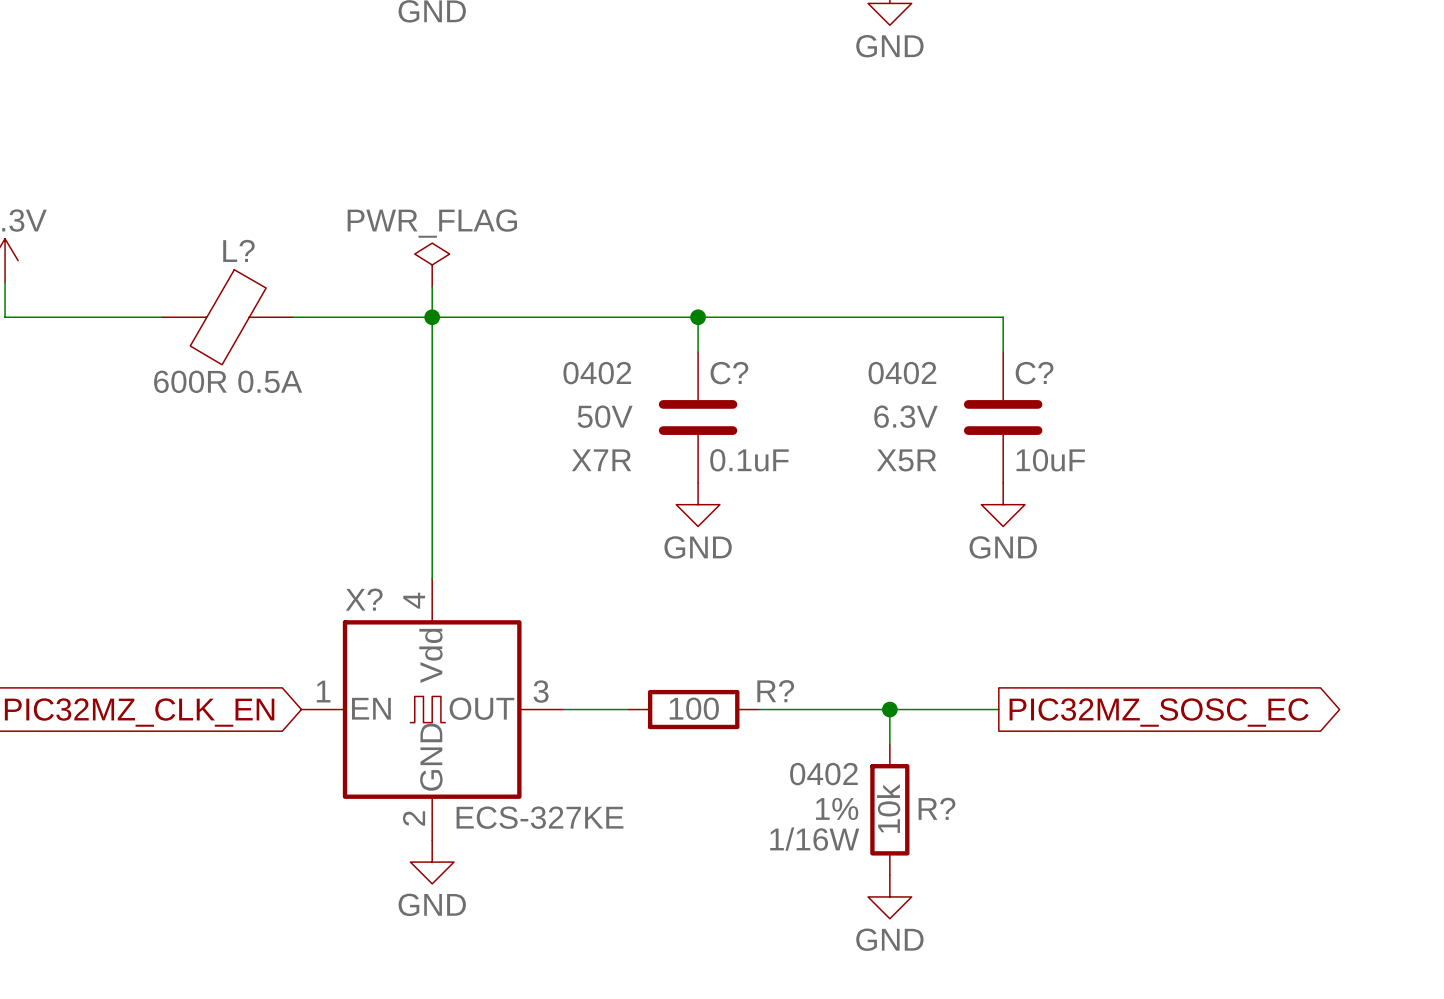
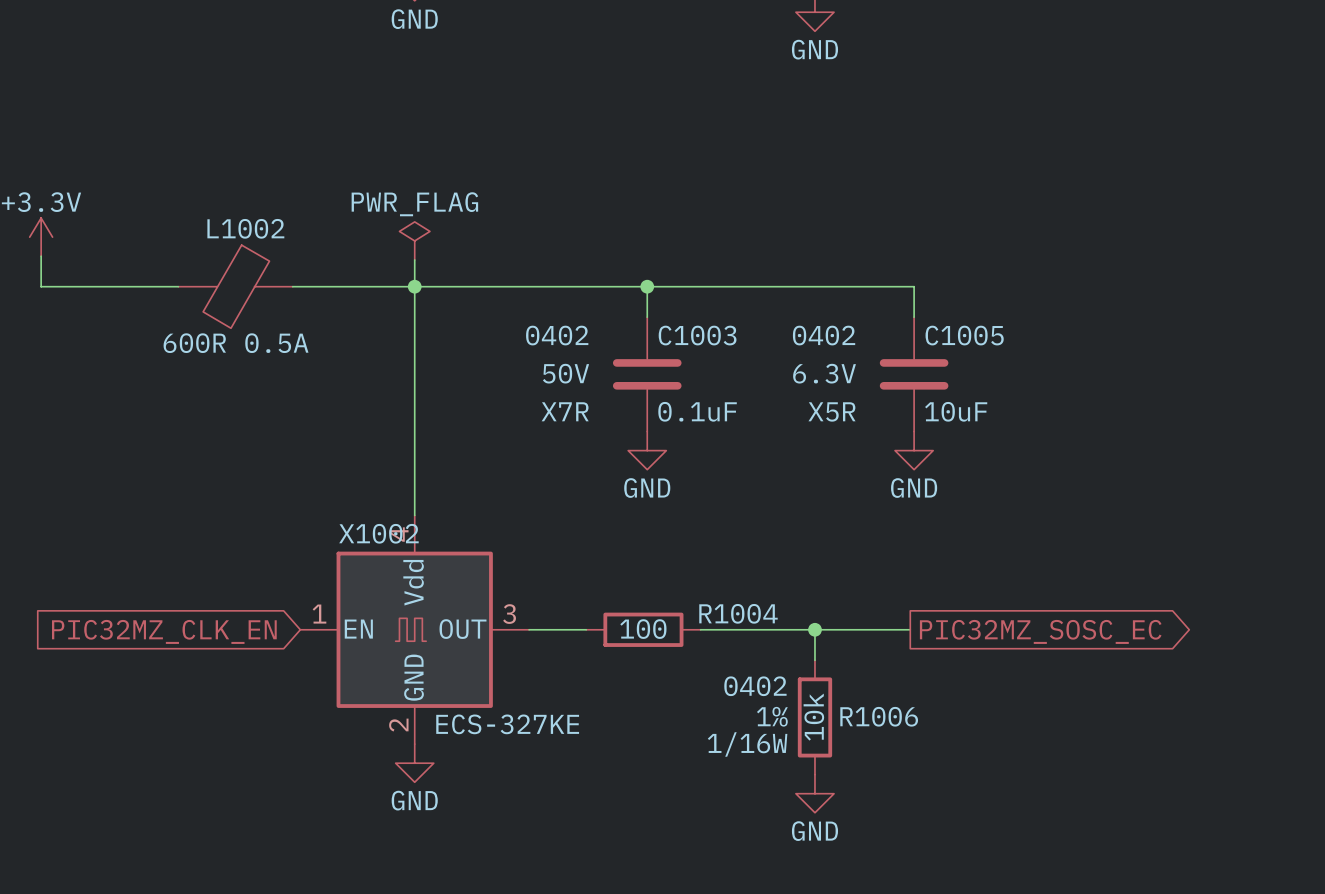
L? name: L? (238, 250) -> L1002 (245, 228)
C? name: C? (729, 373) -> C1003 (697, 335)
C? name: C? (1034, 373) -> C1005 (964, 335)
X? name: X? (364, 599) -> X1002 (378, 533)
R? name: R? (775, 691) -> R1004 (738, 613)
R? name: R? (936, 808) -> R1006 (879, 716)

